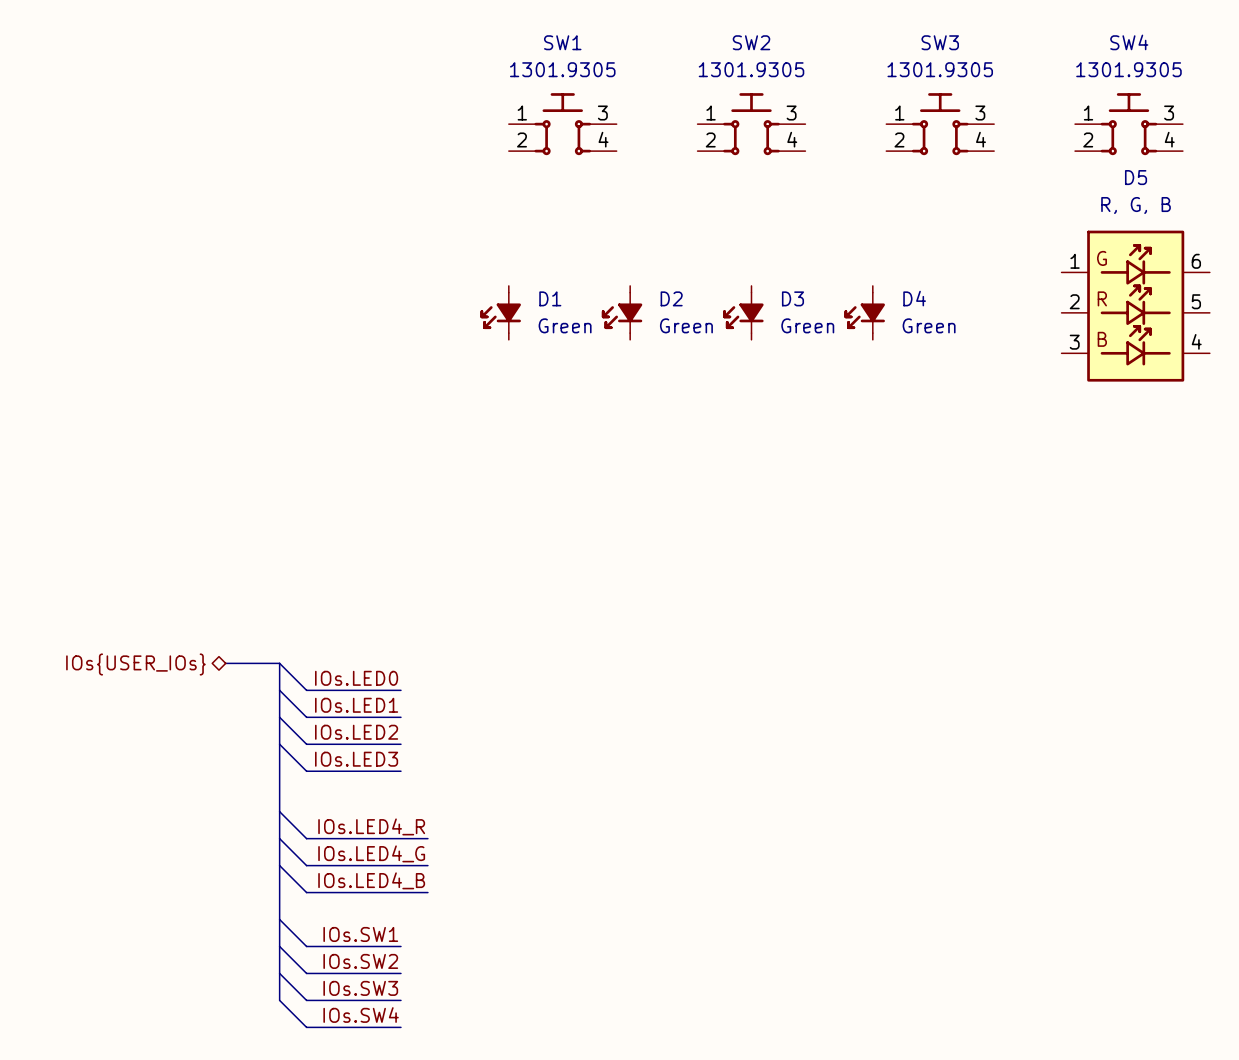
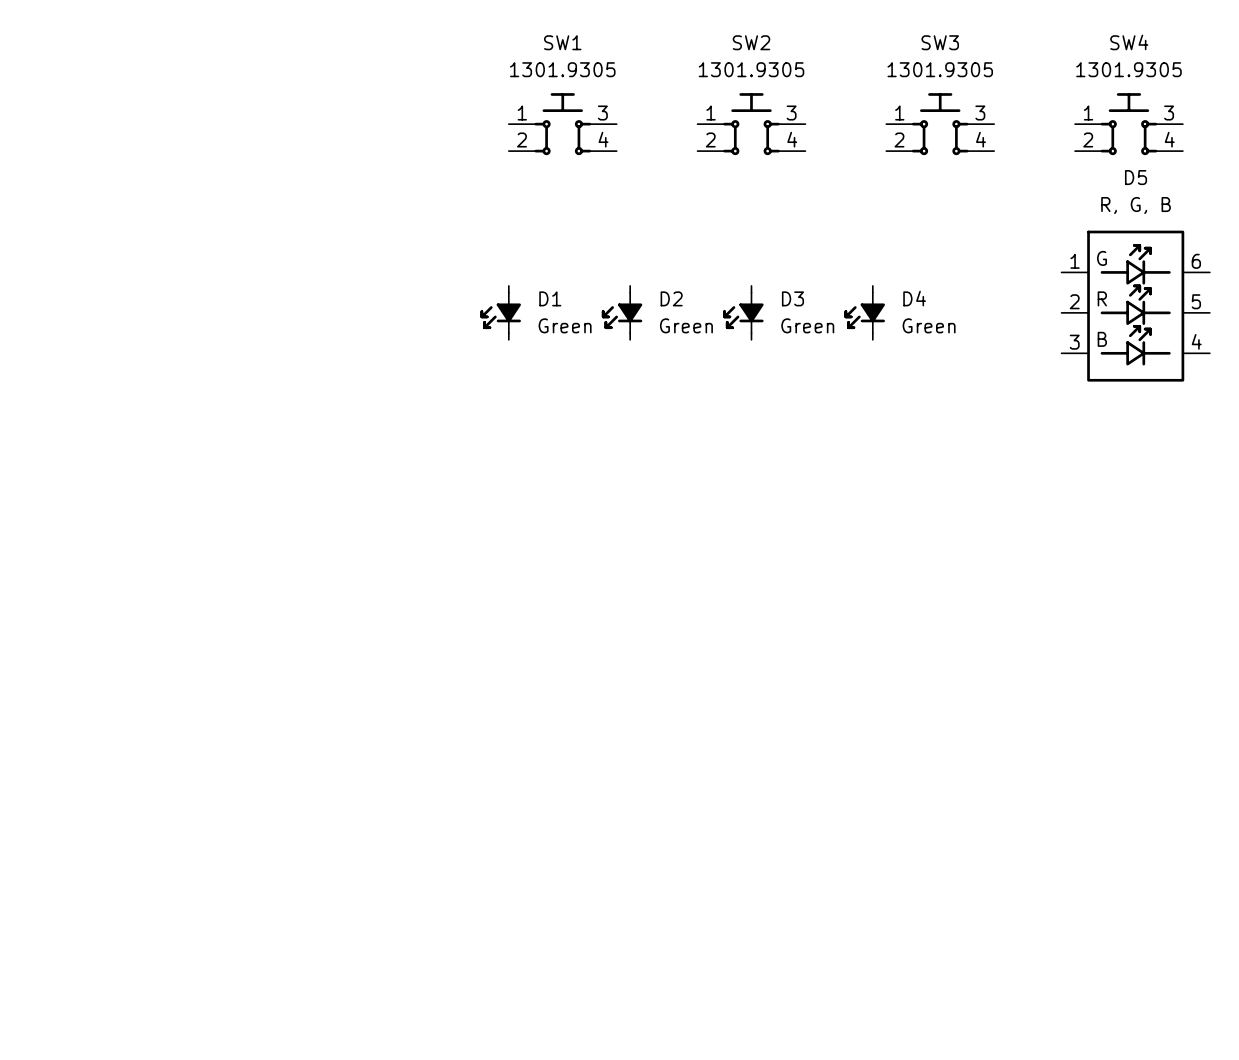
bus: (225, 663) (279, 663) (279, 1000) -> none
wire: (279, 663) (306, 690) (400, 690) -> none
hierarchical label: IOs{USER_IOs} (135, 664) -> none
label: IOs.LED0 (356, 678) -> none
wire: (279, 690) (306, 717) (400, 717) -> none
label: IOs.LED1 (356, 705) -> none
wire: (279, 717) (306, 744) (400, 744) -> none
label: IOs.LED2 (356, 732) -> none
wire: (279, 744) (306, 771) (400, 771) -> none
label: IOs.LED3 (356, 759) -> none
wire: (279, 811) (306, 838) (427, 838) -> none
label: IOs.LED4_R (371, 826) -> none
wire: (279, 838) (306, 865) (427, 865) -> none
label: IOs.LED4_G (371, 853) -> none
wire: (279, 865) (306, 892) (427, 892) -> none
label: IOs.LED4_B (371, 880) -> none
wire: (279, 919) (306, 946) (400, 946) -> none
label: IOs.SW1 (360, 934) -> none
wire: (279, 946) (306, 973) (400, 973) -> none
label: IOs.SW2 (360, 961) -> none
wire: (279, 973) (306, 1000) (400, 1000) -> none
label: IOs.SW3 (360, 988) -> none
wire: (279, 1000) (306, 1027) (400, 1027) -> none
label: IOs.SW4 (361, 1015) -> none

